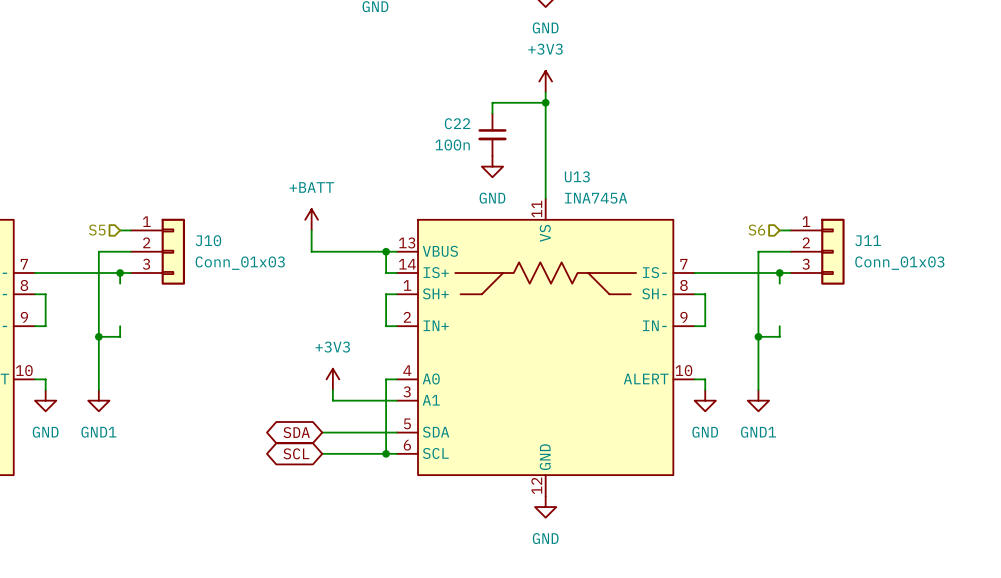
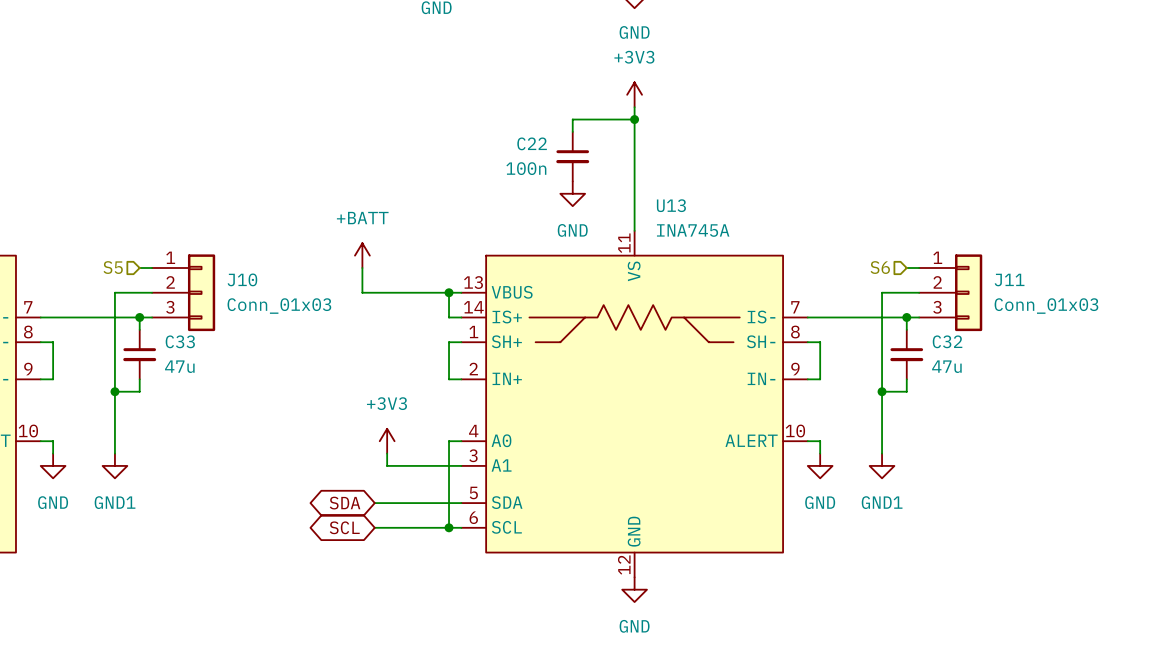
C33: none -> 47u (139, 354)
C32: none -> 47u (906, 354)

